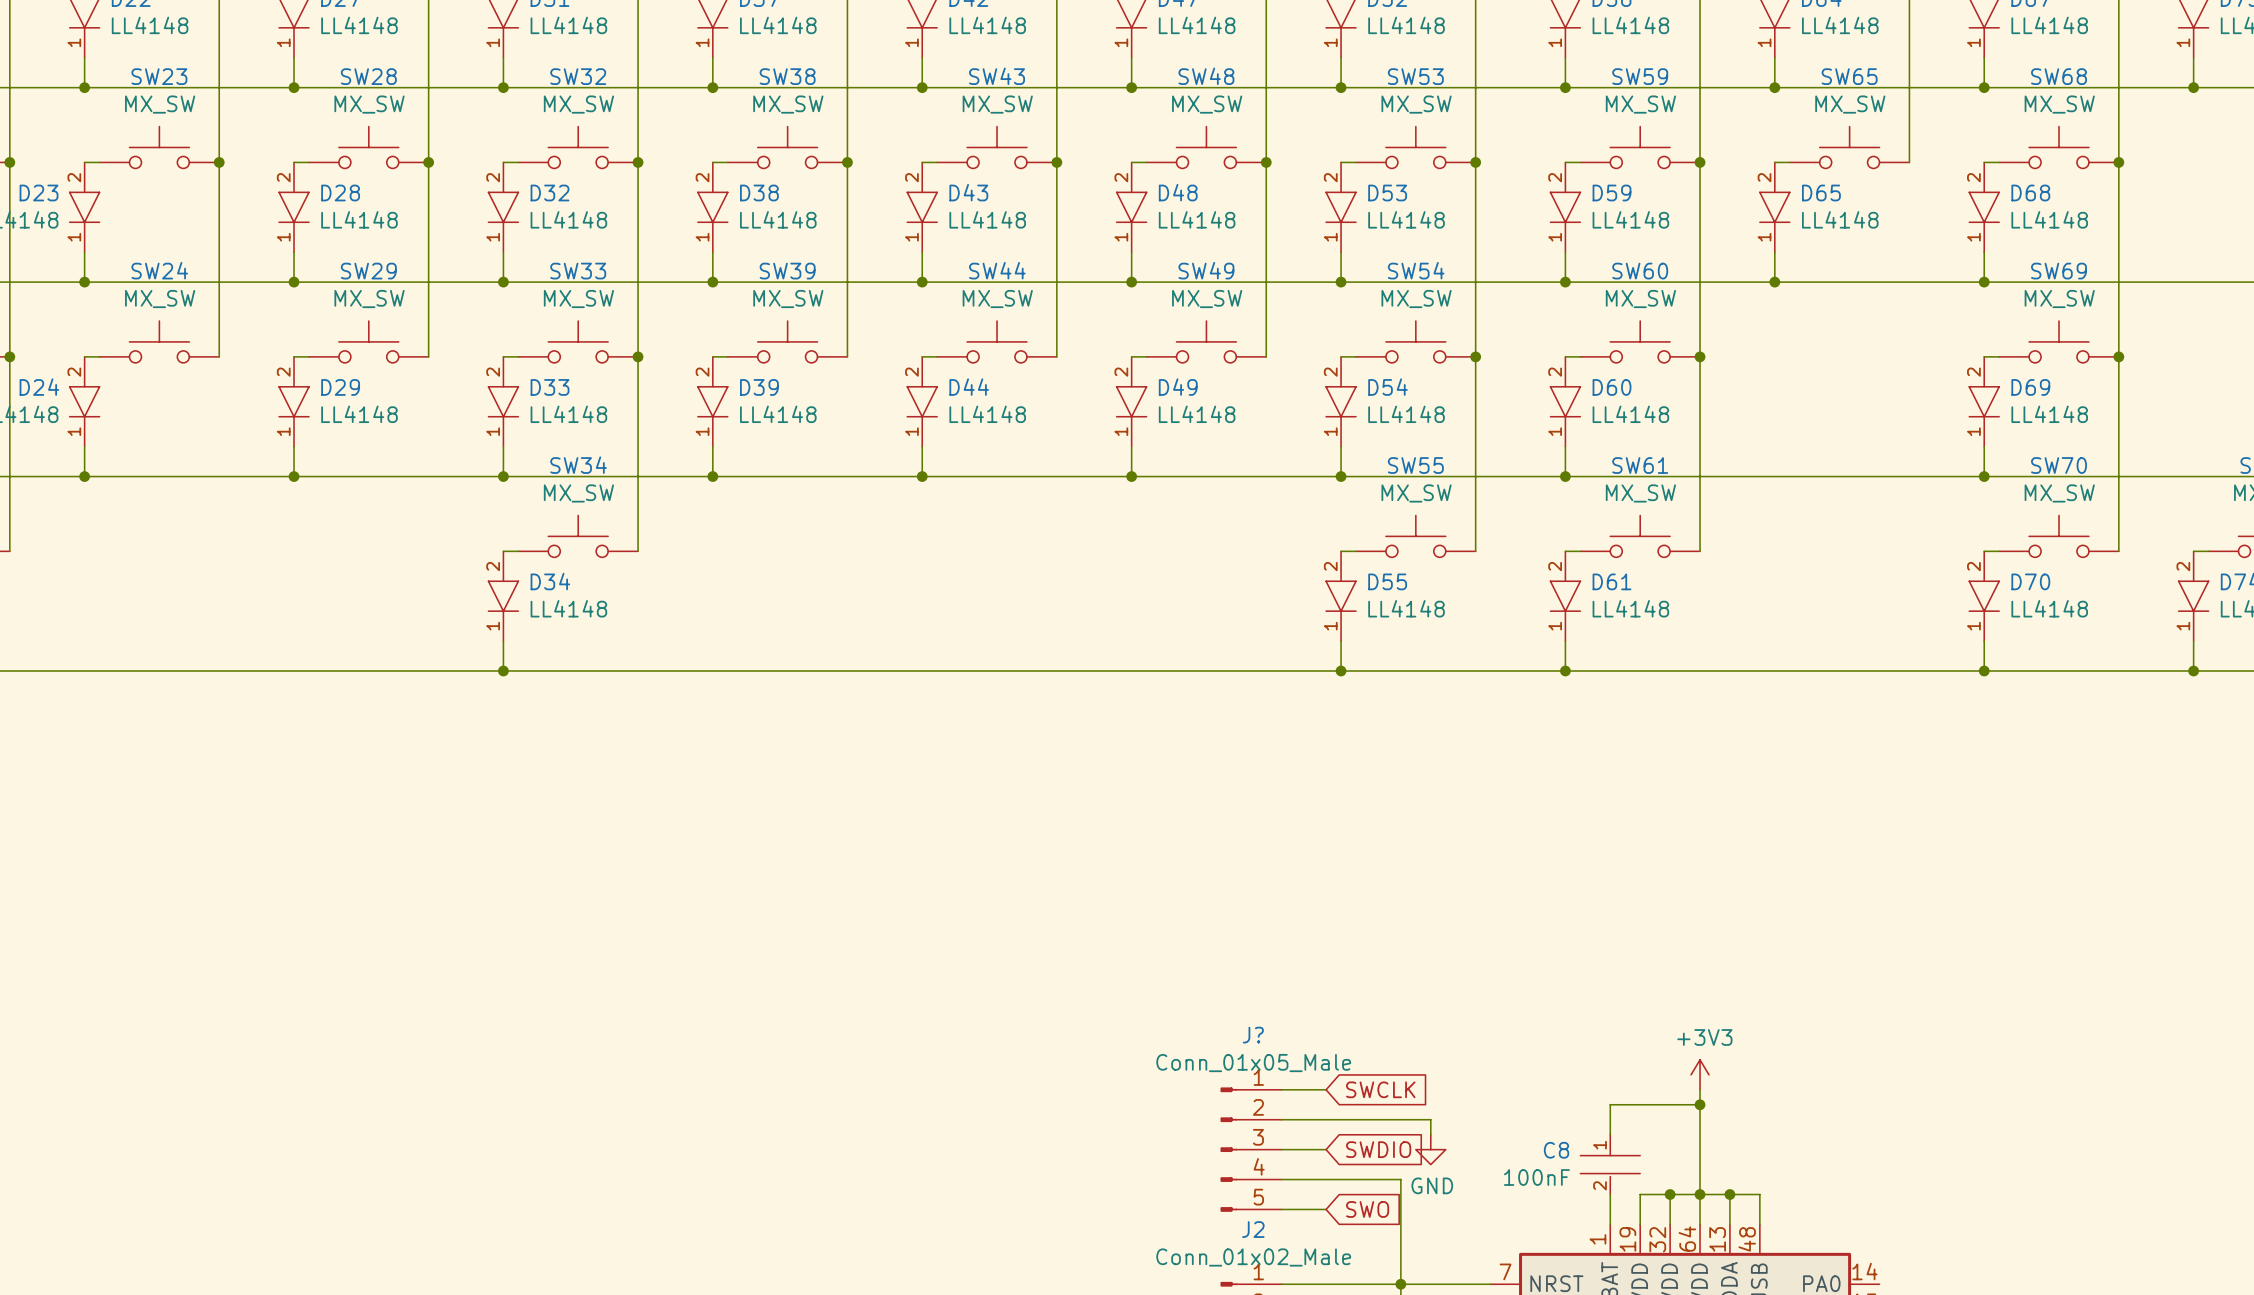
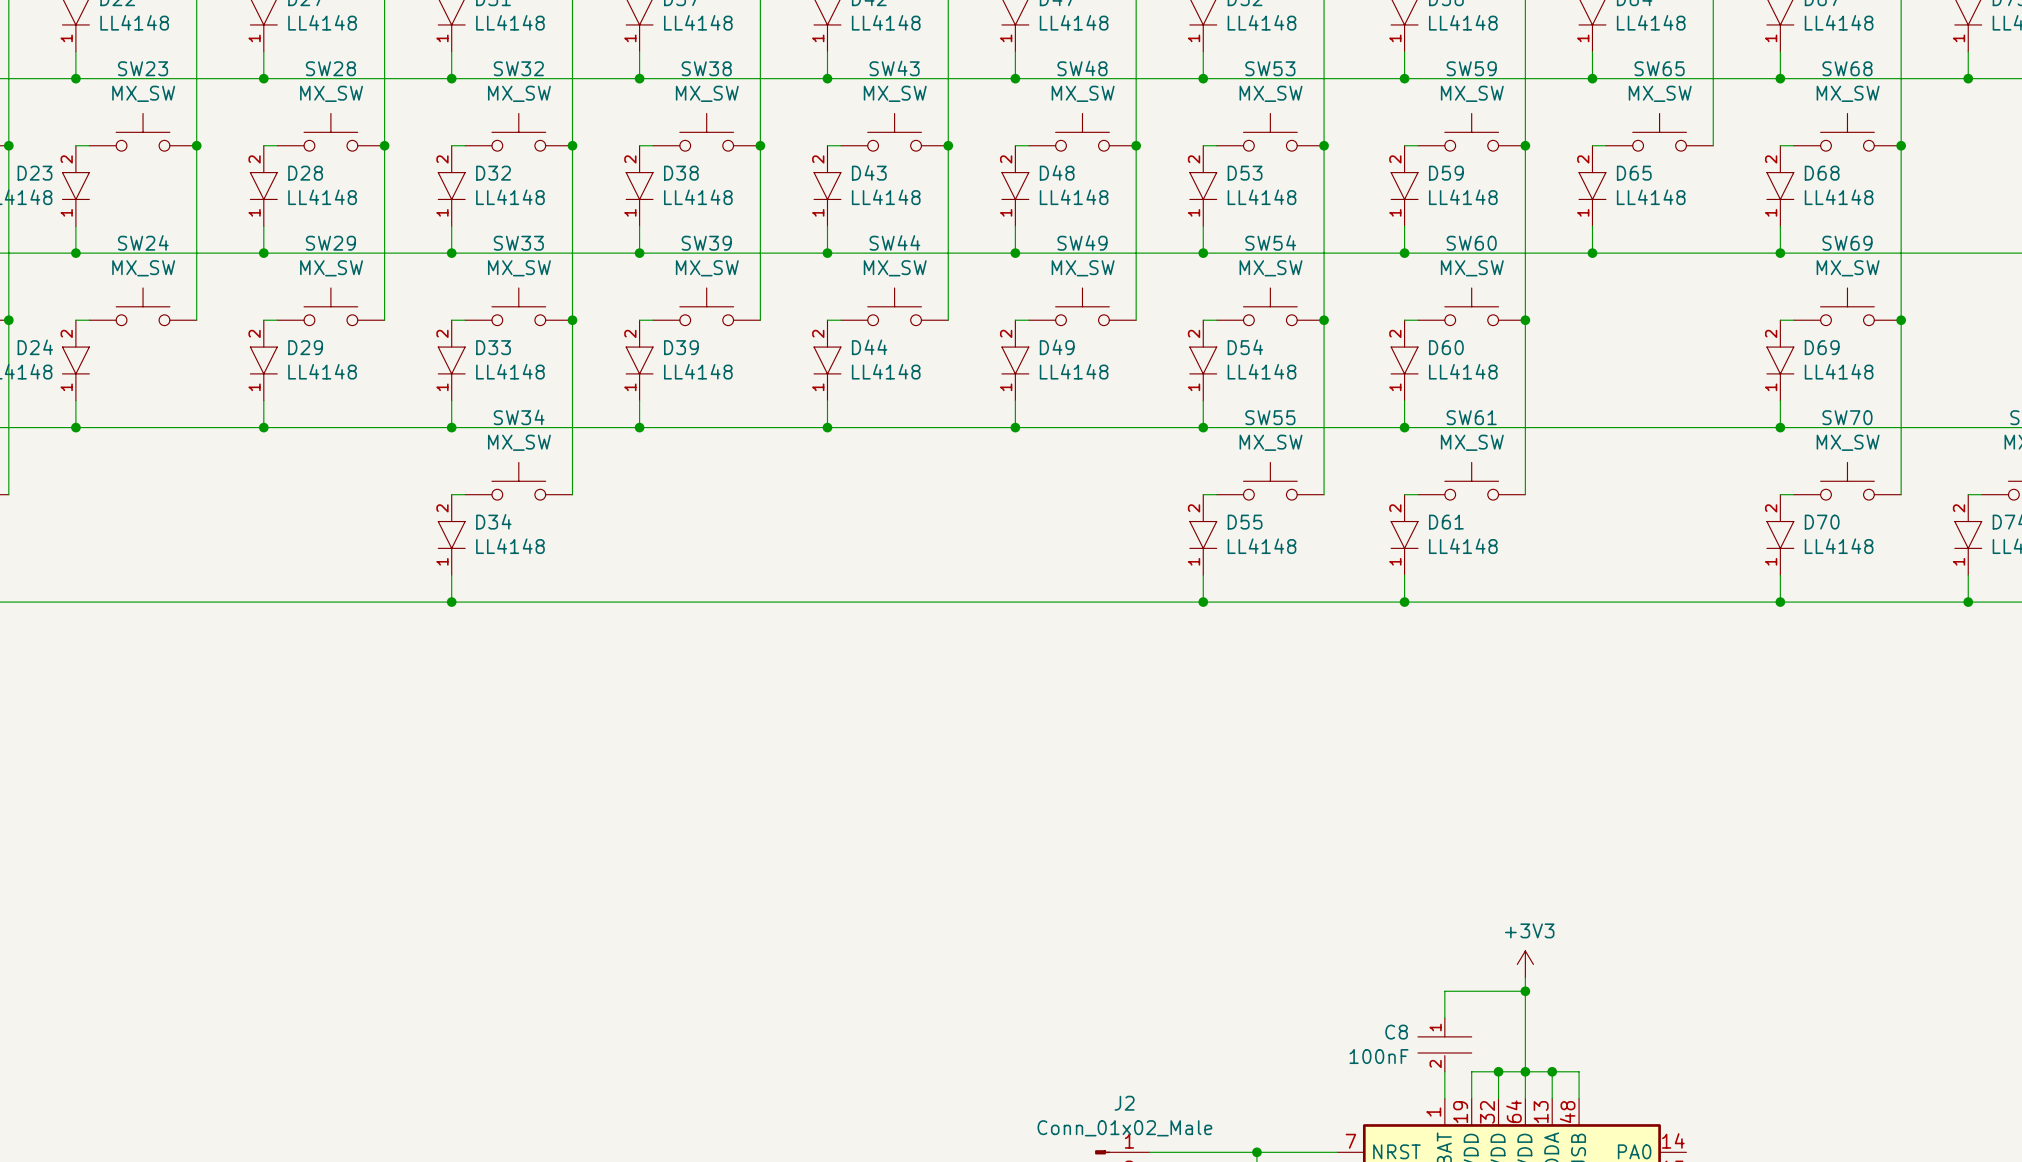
wire: (1281, 1089) (1326, 1089) -> none
global label: SWCLK (1380, 1089) -> none
wire: (1281, 1119) (1430, 1119) (1430, 1134) -> none
J?: Conn_01x05_Male (1250, 1149) -> none
wire: (1281, 1149) (1326, 1149) -> none
global label: SWDIO (1378, 1149) -> none
power symbol: GND (1430, 1149) -> none
wire: (1281, 1179) (1400, 1179) (1400, 1284) -> none
wire: (1281, 1209) (1326, 1209) -> none
global label: SWO (1367, 1209) -> none

